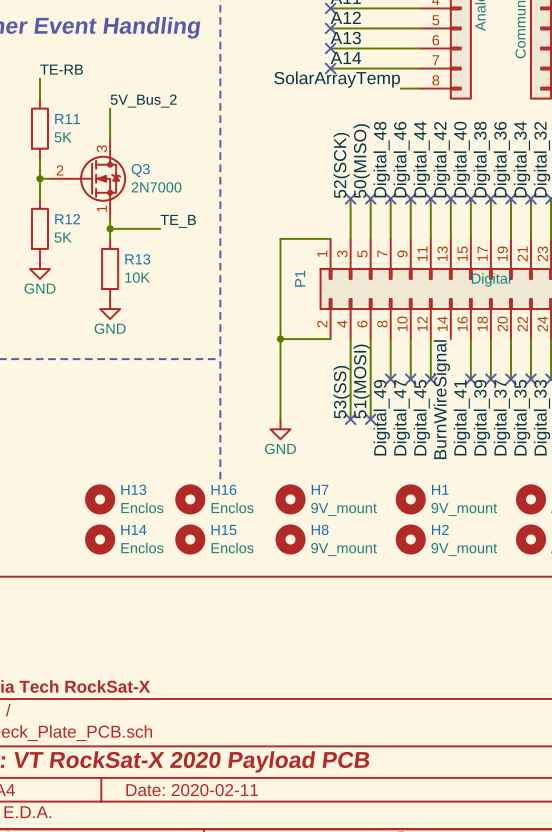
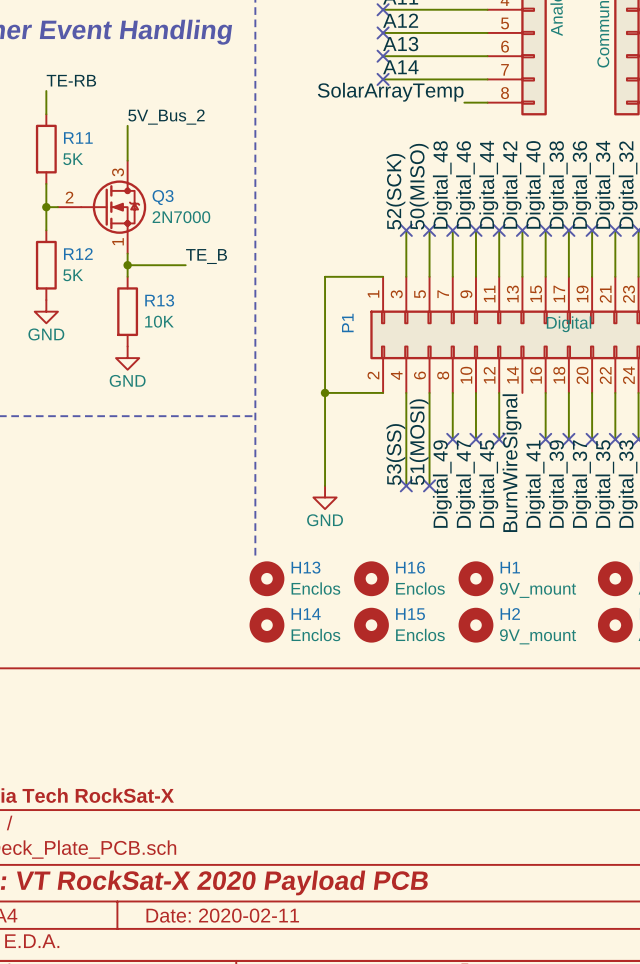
H13 position: (100, 499) -> (266, 578)
H16 position: (190, 499) -> (371, 578)
H7: 9V_mount (290, 499) -> none
H14 position: (100, 539) -> (266, 625)
H15 position: (190, 539) -> (371, 625)
H8: 9V_mount (290, 539) -> none

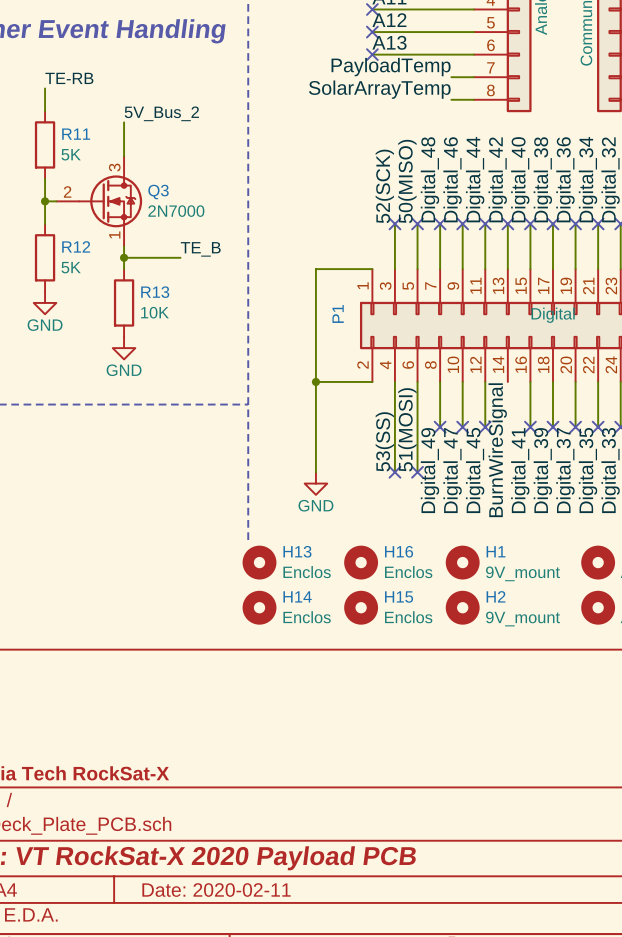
label: A14 (400, 67) -> none
label: none -> PayloadTemp (391, 67)
wire: (383, 79) (464, 79) -> none
no-connect mark: (383, 79) -> none

